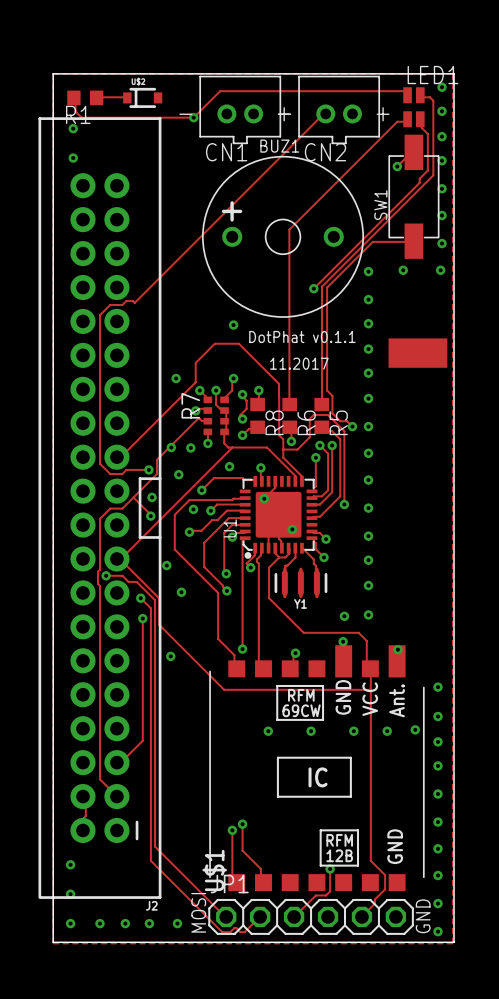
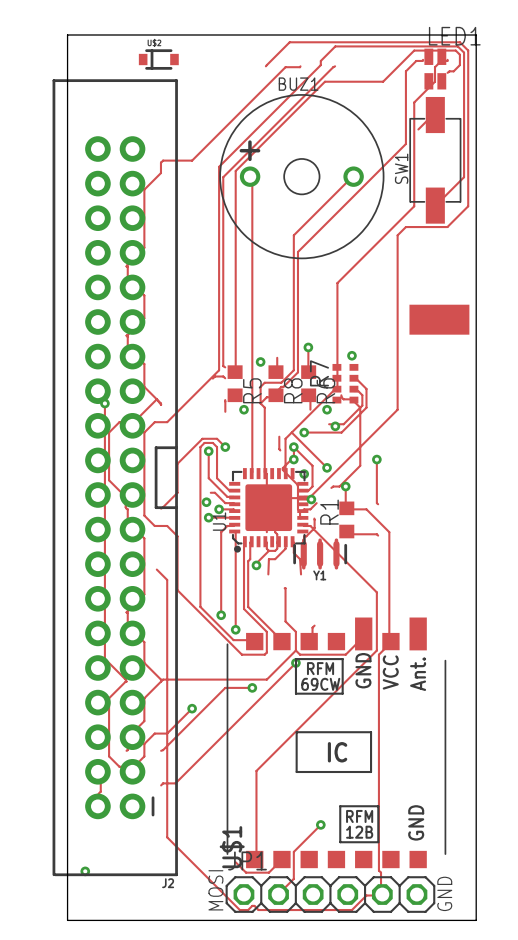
zone outline: (53, 73) (452, 73) (452, 943) (53, 943) (53, 73) -> none
via: (441, 87) -> none
track: (407, 95) (405, 91) (220, 91) (193, 117) (81, 117) (75, 111) (75, 99) (73, 97) -> none
track: (420, 95) (421, 97) (429, 97) (433, 100) (433, 175) (321, 286) (321, 404) -> none
R1 rotation: 0° (85, 97) -> 90° clockwise (346, 519)
R1 position: (85, 97) -> (346, 519)
track: (96, 97) (127, 97) -> none
track: none -> (447, 59) (441, 60) (435, 67) (435, 81) (414, 102) (414, 206) (337, 283) (337, 388) (285, 438) (285, 473)
track: none -> (300, 66) (285, 67) (192, 160) (163, 160) (161, 162)
CN1: (240, 109) -> none
CN2: (339, 109) -> none
track: none -> (447, 72) (453, 71) (459, 65) (459, 54) (455, 50) (414, 50) (383, 81) (324, 81) (235, 170) (235, 372)
via: (441, 111) -> none
track: (325, 113) (134, 302) (126, 300) (122, 304) (110, 304) (100, 315) (100, 463) (110, 473) (122, 473) (126, 469) (148, 469) -> none
via: (193, 117) -> none
track: (407, 119) (405, 121) (397, 121) (289, 229) (289, 380) -> none
track: (420, 119) (421, 127) (427, 133) (427, 170) (419, 178) (419, 182) (313, 288) -> none
via: (73, 128) -> none
via: (441, 136) -> none
via: (73, 158) -> none
via: (441, 160) -> none
via: (397, 166) -> none
via: (441, 188) -> none
track: none -> (160, 162) (160, 173) (144, 189) (144, 247) (126, 266) (127, 278) (144, 295) (144, 318) (126, 335) (127, 347) (144, 364) (144, 386) (160, 403) (161, 404) (156, 399) (133, 422) (119, 422) (109, 432) (109, 480) (125, 496) (127, 521) (133, 528)
track: none -> (250, 176) (252, 179) (251, 473)
track: none -> (353, 176) (293, 235) (293, 370) (281, 382) (264, 382) (260, 386) (260, 403) (264, 407) (264, 472) (266, 474) (266, 507) (268, 507) (266, 509) (266, 532)
via: (441, 215) -> none
BUZ1 position: (283, 236) -> (301, 176)
track: (413, 241) (372, 241) (327, 287) (327, 390) (332, 395) (332, 413) (340, 421) (347, 421) (352, 426) -> (435, 205) (464, 177) (464, 52) (457, 46) (335, 46) (320, 60) (320, 65) (219, 166) (219, 370) (167, 422) (154, 422) (144, 432) (144, 515) (154, 525) (167, 525) (177, 536) (177, 590) (241, 654) (264, 654) (266, 652) (266, 631) (244, 609) (244, 541)
via: (441, 243) -> none
via: (403, 270) -> none
via: (440, 270) -> none
via: (368, 271) -> none
via: (313, 288) -> none
via: (368, 299) -> none
via: (368, 323) -> none
via: (233, 325) -> none
text: DotPhat v0.1.1 (302, 336) -> none
via: (368, 349) -> none
text: 11.2017 (299, 363) -> none
via: (368, 373) -> none
via: (176, 378) -> none
track: (233, 378) (232, 390) (224, 399) -> none
via: (233, 378) -> none
via: none -> (308, 347)
via: none -> (351, 355)
track: (199, 390) (205, 396) -> (335, 66) (223, 177) (223, 364)
via: (199, 390) -> none
track: (216, 390) (216, 404) (226, 410) (224, 443) (228, 447) (267, 447) (295, 476) (295, 481) -> none
via: (216, 390) -> none
via: (258, 390) -> none
track: (242, 394) (246, 400) (246, 408) (240, 414) (242, 419) -> none
track: (279, 396) (278, 383) (238, 343) (214, 343) (195, 362) (195, 382) (122, 455) (116, 457) -> (297, 364) (297, 251) (405, 144) (405, 71) (416, 60) (423, 59)
via: (368, 398) -> none
track: (279, 404) (279, 435) (283, 439) (283, 457) (301, 476) (301, 481) -> (297, 372) (271, 395)
via: (195, 410) -> none
track: none -> (353, 378) (366, 388) (366, 407) (341, 432) (304, 432)
R7 position: (216, 415) -> (345, 383)
R5 position: (321, 415) -> (235, 383)
via: (242, 419) -> none
track: (207, 421) (197, 419) (157, 459) (157, 473) (122, 508) (110, 508) (100, 518) (100, 569) (97, 571) (97, 583) (100, 585) (100, 779) (116, 796) -> none
track: none -> (353, 389) (362, 395) (362, 405) (343, 424) (329, 424)
via: (352, 426) -> none
via: (368, 426) -> none
track: none -> (104, 403) (104, 658) (126, 681) (109, 698) (109, 756) (119, 766) (133, 766) (144, 756) (144, 743) (154, 733) (167, 733) (192, 708)
via: none -> (104, 403)
via: (242, 435) -> none
via: none -> (244, 409)
via: (291, 441) -> none
via: none -> (327, 409)
via: (207, 443) -> none
track: (319, 445) (328, 453) (328, 490) -> (265, 66) (289, 42) (459, 42) (468, 50) (468, 206) (447, 227) (405, 227) (397, 235) (397, 409) (347, 459)
via: (319, 445) -> none
track: (332, 445) (332, 492) (319, 504) (311, 504) -> none
via: (332, 445) -> none
via: (171, 447) -> none
via: (190, 447) -> none
track: (232, 447) (122, 557) (116, 558) -> none
track: (283, 449) (297, 449) (309, 437) (309, 419) (313, 414) (328, 414) (344, 431) (344, 504) -> none
via: (368, 453) -> none
track: (315, 457) (315, 486) (311, 491) -> none
track: none -> (291, 432) (327, 467)
via: none -> (304, 432)
via: (229, 466) -> none
via: (260, 467) -> none
via: (148, 469) -> none
via: (178, 474) -> none
track: none -> (225, 447) (217, 438) (202, 438) (177, 463) (177, 492) (161, 508)
via: none -> (225, 447)
track: none -> (293, 447) (312, 465) (312, 486) (308, 490) (302, 490)
via: none -> (293, 447)
via: (368, 480) -> none
track: (255, 481) (242, 478) (214, 478) (201, 490) -> none
track: none -> (208, 451) (208, 478) (227, 496) (234, 497)
via: none -> (208, 451)
via: (201, 490) -> none
via: none -> (293, 459)
track: none -> (376, 459) (378, 504)
via: none -> (376, 459)
track: (321, 496) (311, 498) -> (341, 465) (310, 496) (302, 497)
track: (133, 497) (150, 516) -> none
via: (152, 497) -> none
via: (264, 498) -> none
via: none -> (327, 467)
track: (241, 499) (245, 498) (232, 500) (189, 500) (174, 514) (174, 549) (218, 592) -> (234, 531) (235, 564)
track: (245, 504) (217, 504) (210, 510) -> none
via: none -> (304, 474)
via: (344, 504) -> none
via: (368, 508) -> none
via: (193, 509) -> none
via: (210, 510) -> none
track: (245, 511) (227, 510) (217, 520) (212, 520) (201, 530) (189, 532) -> none
via: (150, 516) -> none
via: none -> (345, 486)
U1 position: (278, 517) -> (268, 510)
track: (245, 518) (228, 518) (204, 542) (204, 566) (226, 590) -> none
track: none -> (234, 490) (229, 490) (217, 478) (217, 447) (212, 442) (204, 442) (200, 447) (200, 606) (233, 640) (254, 640)
track: none -> (210, 492) (214, 492) (225, 503) (234, 504)
track: (245, 524) (232, 524) (224, 533) (224, 571) (226, 573) -> none
track: (245, 531) (236, 533) (232, 537) -> none
track: (311, 531) (319, 533) (326, 539) -> none
track: none -> (316, 503) (310, 509) (302, 511)
via: (368, 536) -> none
via: (232, 537) -> none
track: (245, 538) (242, 541) (242, 649) -> none
track: (311, 538) (315, 543) (315, 549) (324, 557) -> none
track: none -> (219, 509) (233, 509) (234, 511)
via: none -> (219, 509)
via: (326, 539) -> none
track: none -> (208, 517) (234, 517)
via: none -> (208, 517)
track: (255, 548) (254, 555) (246, 563) (250, 567) -> none
track: (275, 548) (275, 553) (279, 557) -> none
track: (288, 548) (289, 553) (285, 557) (279, 557) -> none
track: (301, 548) (313, 559) (316, 582) -> none
track: none -> (234, 524) (227, 525) (221, 532) (221, 615)
track: (279, 557) (269, 567) (269, 598) (303, 632) (358, 632) (366, 640) (366, 665) (368, 667) -> (345, 486) (345, 507) (347, 509) (366, 509) (389, 532) (389, 640)
via: (324, 557) -> none
track: none -> (346, 531) (349, 534) (378, 535)
via: (368, 560) -> none
via: (166, 565) -> none
track: (128, 567) (159, 598) (159, 624) (224, 689) (370, 689) -> (144, 538) (144, 594) (126, 612) (127, 625) (144, 642) (144, 662) (161, 681) (163, 679) (266, 679) (295, 650)
via: (250, 567) -> none
track: none -> (265, 541) (268, 550)
track: none -> (285, 541) (285, 548) (275, 559) (268, 559) (268, 574)
track: none -> (292, 541) (293, 552) (300, 559) (301, 574)
via: (226, 573) -> none
track: (106, 575) (122, 575) (128, 581) (136, 581) (155, 600) (155, 846) (226, 916) -> none
via: (106, 575) -> none
track: (258, 577) (258, 663) -> (251, 541) (250, 559) (248, 561) (248, 606) (277, 636)
track: none -> (277, 548) (275, 550) (268, 550)
track: none -> (268, 550) (256, 565)
via: (368, 585) -> none
via: (226, 590) -> none
via: (181, 592) -> none
via: none -> (256, 565)
via: (140, 598) -> none
via: (368, 614) -> none
track: none -> (284, 588) (285, 621) (295, 631) (295, 650)
via: (344, 616) -> none
track: (142, 618) (142, 740) (122, 761) (116, 762) -> none
via: (142, 618) -> none
track: (218, 638) (234, 655) (234, 665) (236, 667) -> (235, 611) (235, 629)
via: (343, 641) -> none
via: none -> (221, 615)
via: (242, 649) -> none
via: (397, 649) -> none
via: (295, 653) -> none
via: (170, 656) -> none
via: none -> (235, 629)
track: none -> (363, 633) (364, 636) (345, 654) (300, 654) (295, 650)
track: (370, 669) (370, 860) (385, 875) (385, 889) (361, 916) -> (391, 642) (378, 654) (378, 870) (381, 872) (382, 894) (366, 895) (351, 910) (262, 910)
via: (437, 687) -> none
track: none -> (295, 662) (175, 783) (163, 783) (161, 785)
via: none -> (295, 662)
track: none -> (160, 681) (144, 698) (144, 721) (127, 737) (126, 750)
track: none -> (252, 687) (225, 687) (161, 750)
via: none -> (252, 687)
via: (437, 716) -> none
via: (415, 729) -> none
via: (268, 731) -> none
via: (311, 731) -> none
via: (353, 731) -> none
via: (387, 731) -> none
via: none -> (192, 708)
via: (437, 741) -> none
via: (437, 765) -> none
via: (437, 794) -> none
via: (437, 822) -> none
track: (242, 824) (242, 850) (260, 869) (260, 879) (263, 882) -> (235, 862) (246, 872) (268, 872) (281, 859)
via: (242, 824) -> none
track: (232, 830) (232, 877) (236, 882) -> (302, 524) (310, 525) (376, 592) (376, 650) (256, 770) (256, 858) (254, 859)
via: (232, 830) -> none
via: none -> (320, 824)
via: (437, 848) -> none
via: (70, 864) -> none
track: (330, 869) (330, 891) (326, 895) (315, 895) (294, 916) -> none
via: (330, 869) -> none
via: (437, 875) -> none
via: (437, 903) -> none
track: (260, 916) (244, 932) -> (278, 894) (293, 878) (293, 851) (320, 824)
via: (70, 923) -> none
via: (99, 923) -> none
via: (125, 923) -> none
via: (149, 923) -> none
via: (177, 923) -> none
via: (437, 931) -> none

